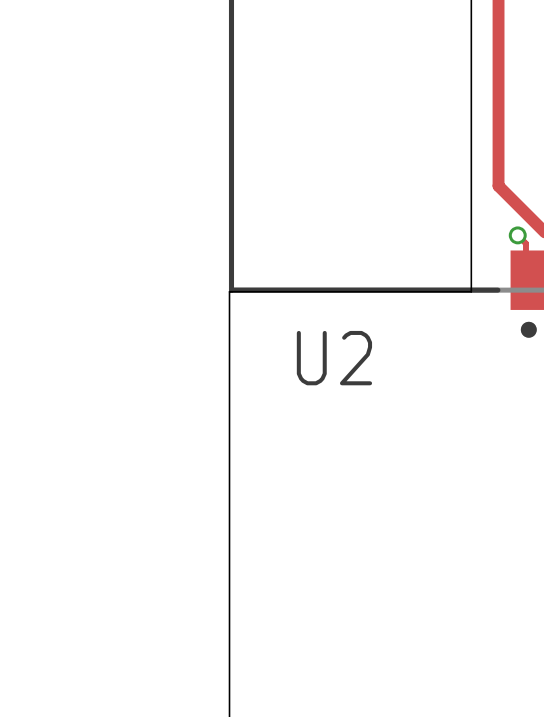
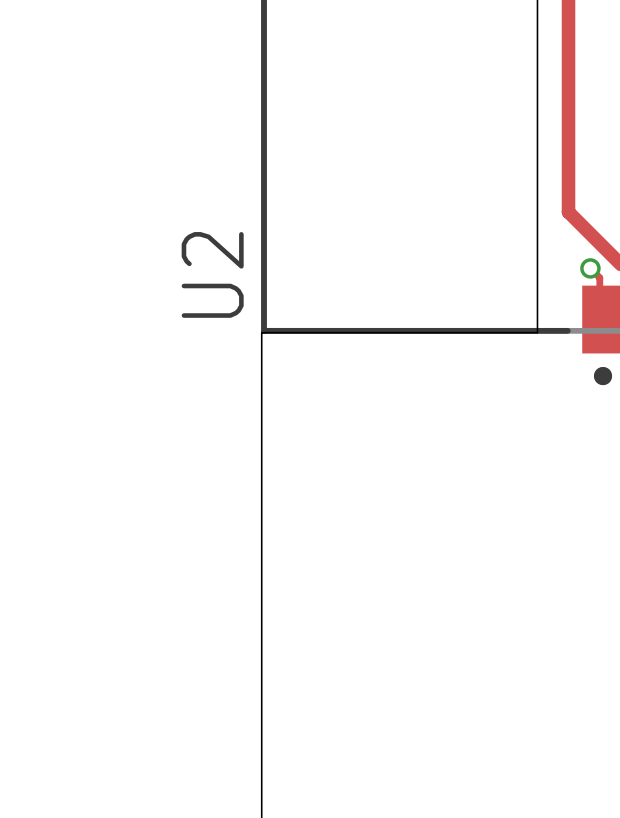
U2 name: none -> U2 (212, 274)
text: U2 (334, 358) -> none

